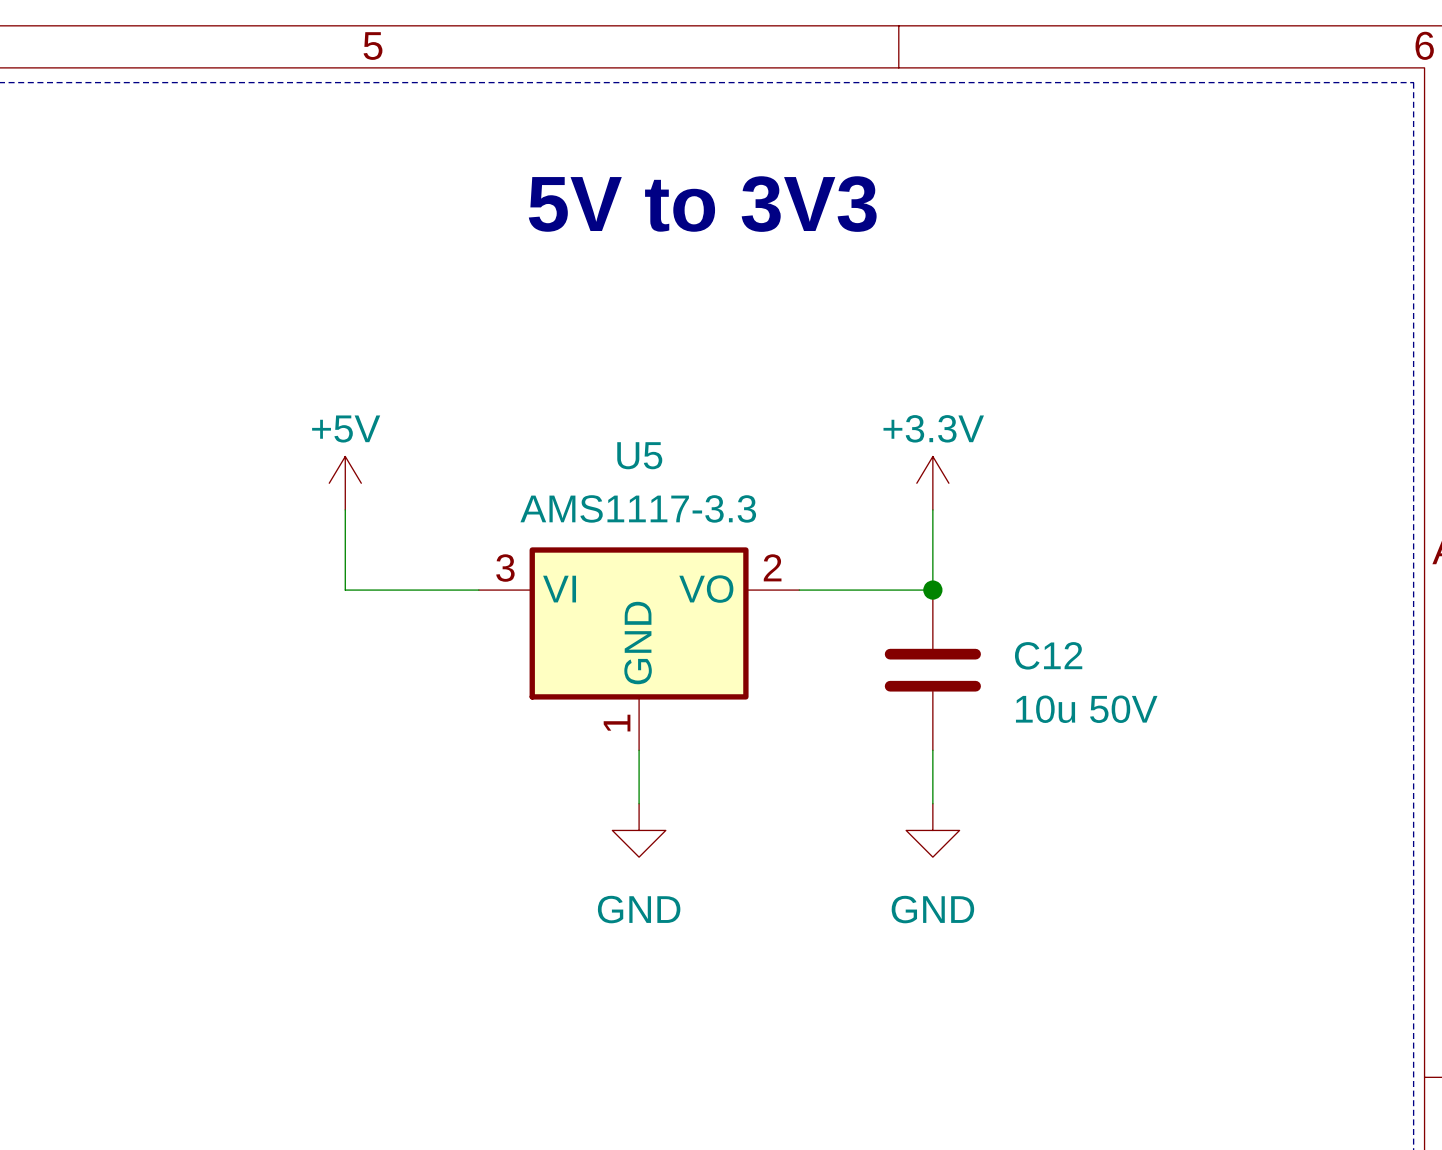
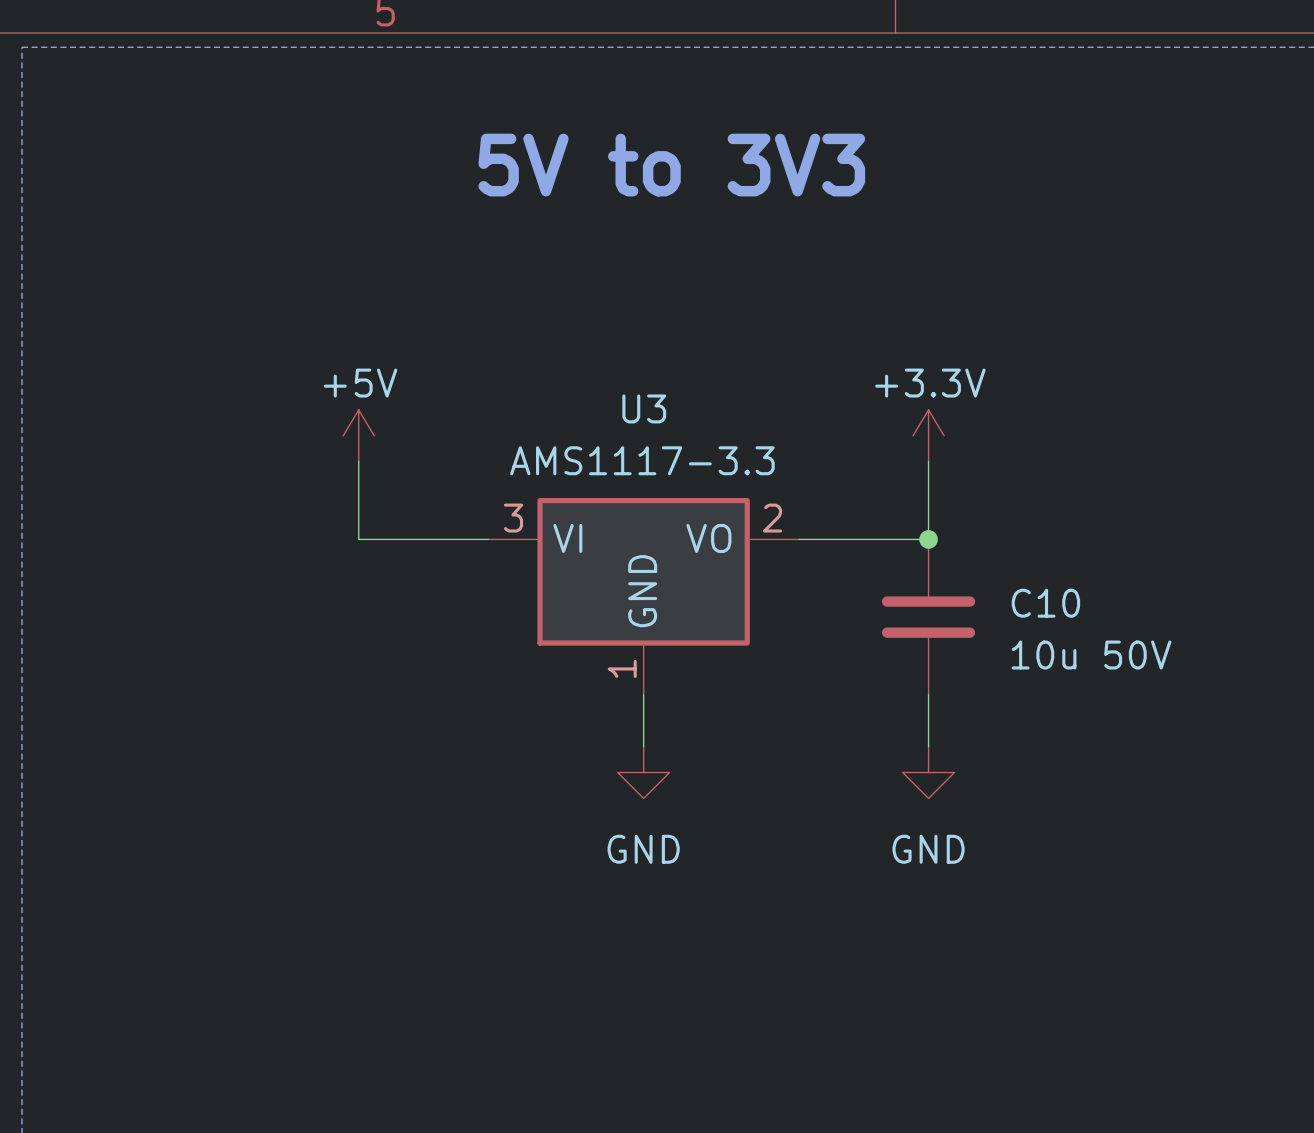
U5 name: U5 (639, 455) -> U3 (644, 408)
C12 name: C12 (1048, 655) -> C10 (1045, 603)

